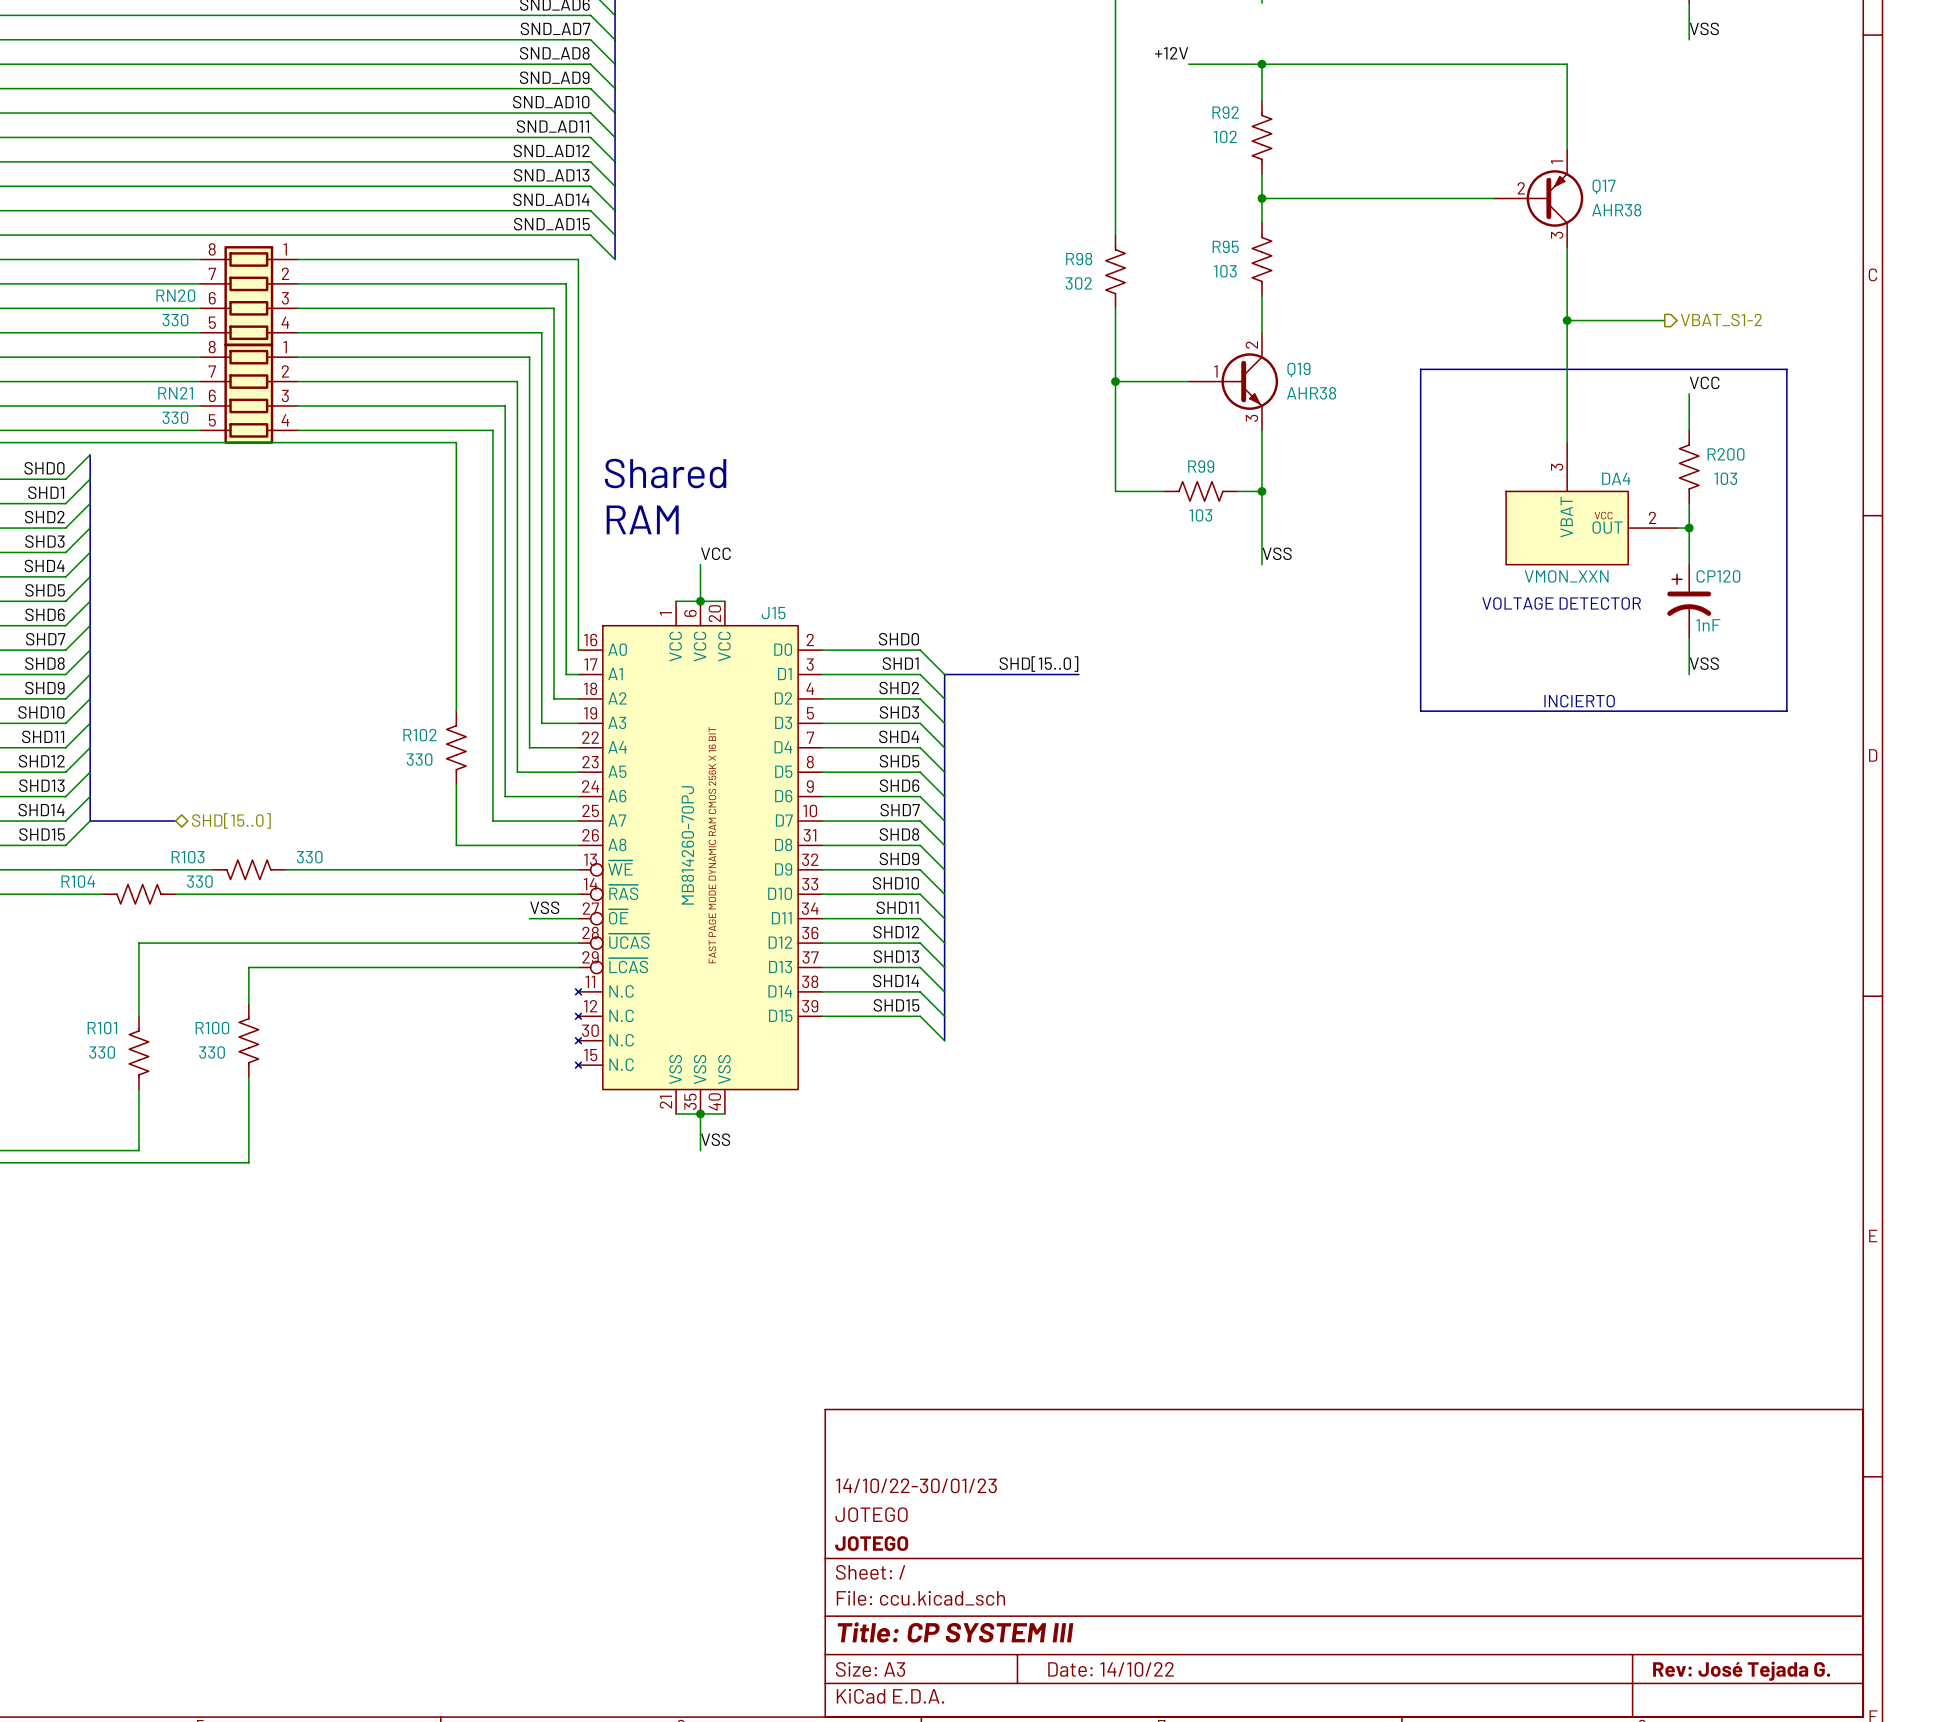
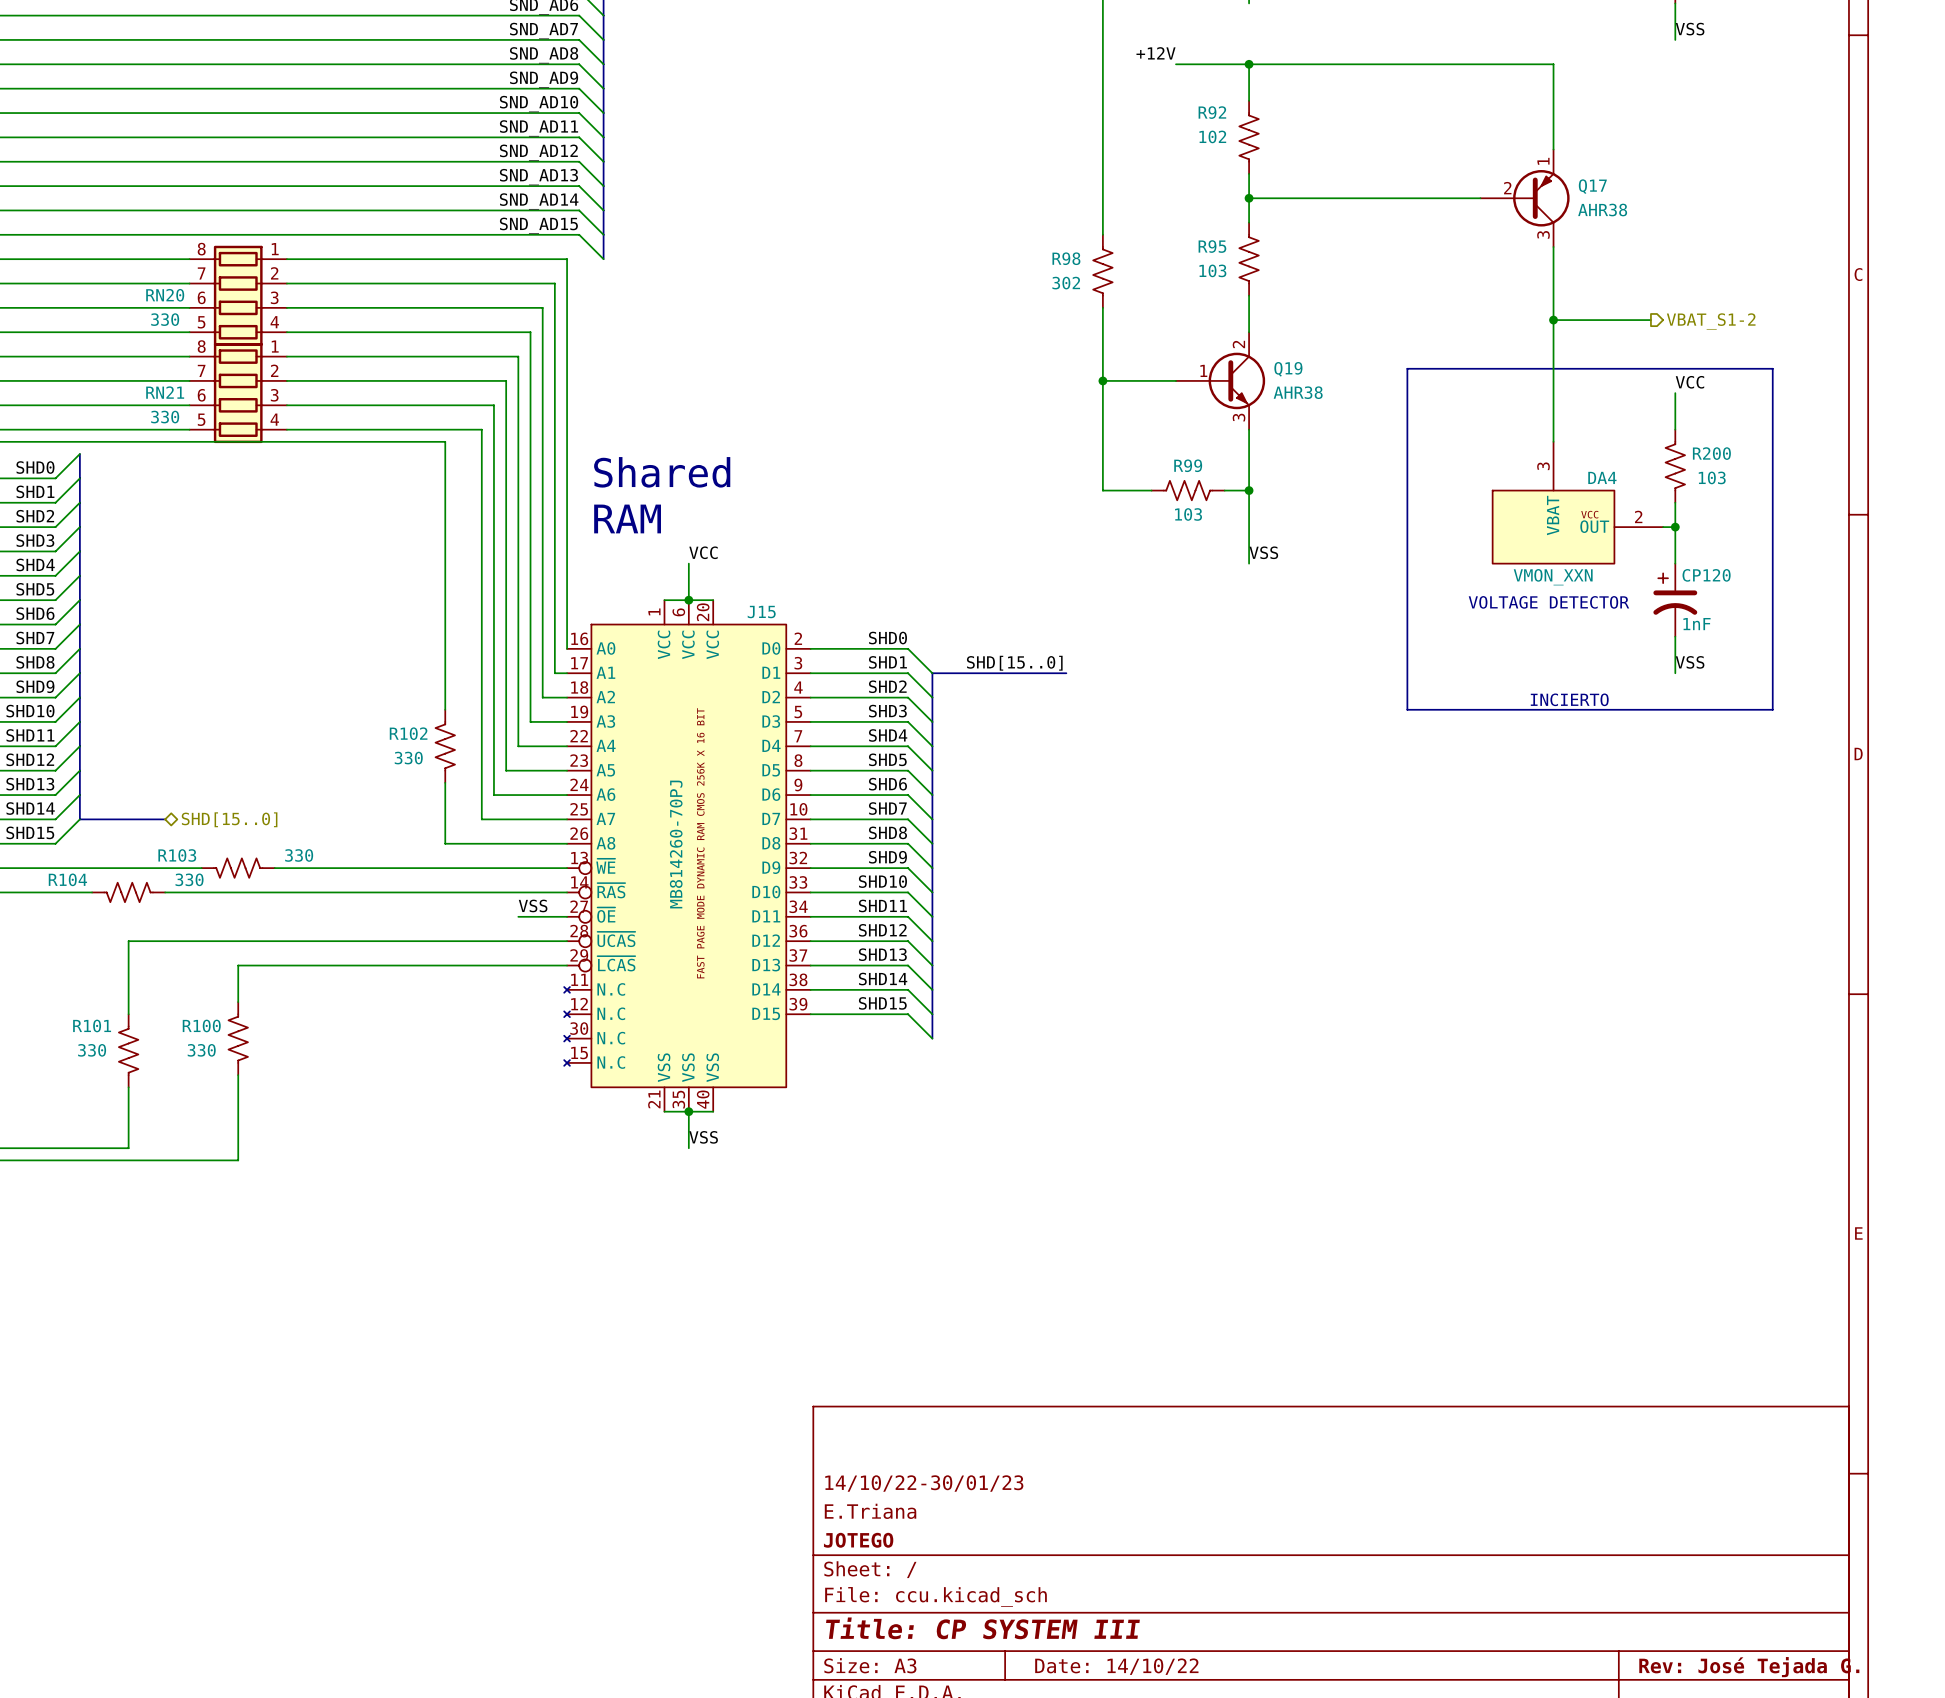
title block: JOTEGO (871, 1514) -> E.Triana (870, 1511)

